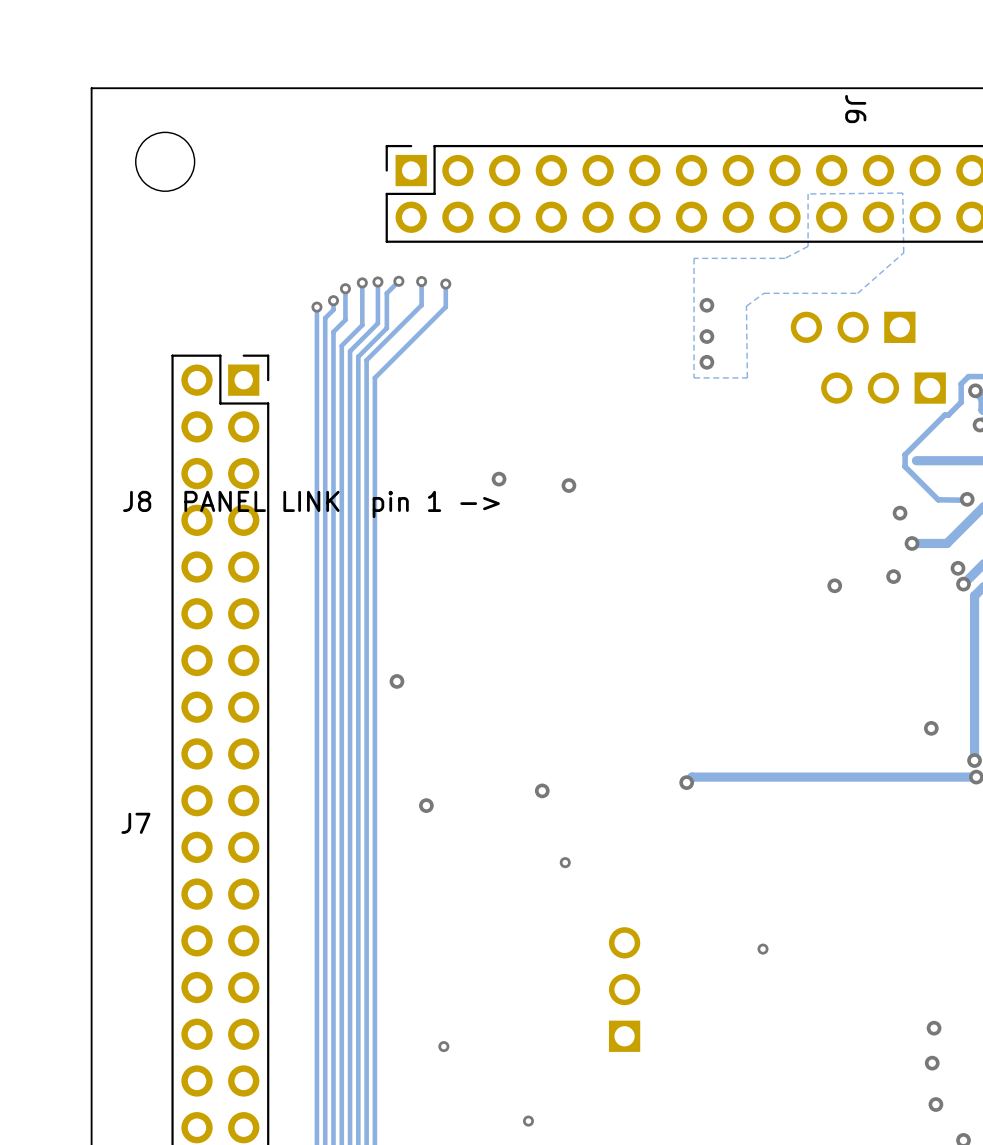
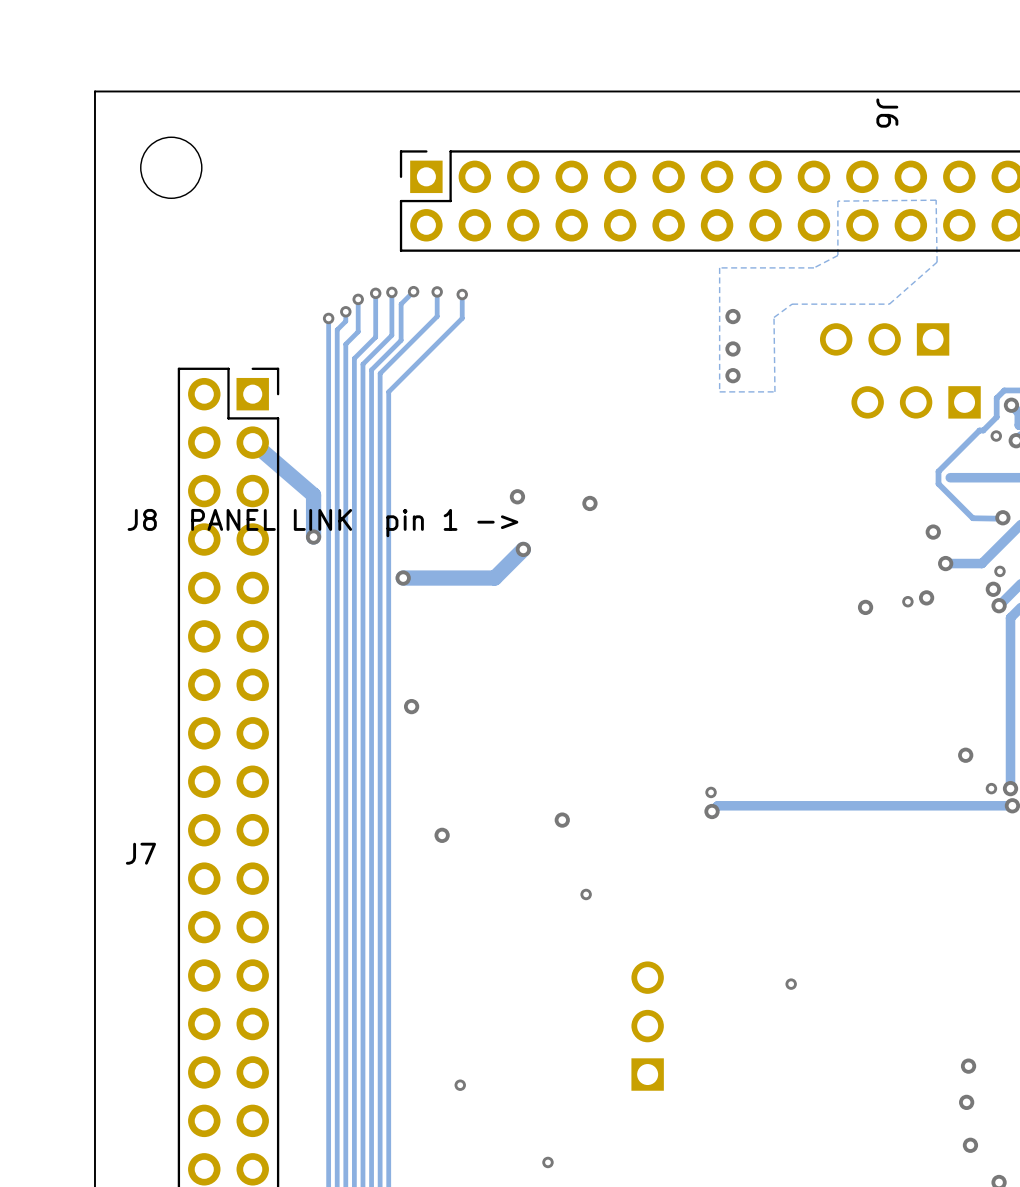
via: none -> (996, 436)
track: none -> (252, 442) (313, 495) (313, 537)
via: none -> (313, 537)
track: none -> (523, 549) (494, 578) (403, 578)
via: none -> (523, 549)
via: none -> (999, 571)
via: none -> (403, 578)
via: none -> (907, 601)
via: none -> (991, 788)
via: none -> (711, 792)

